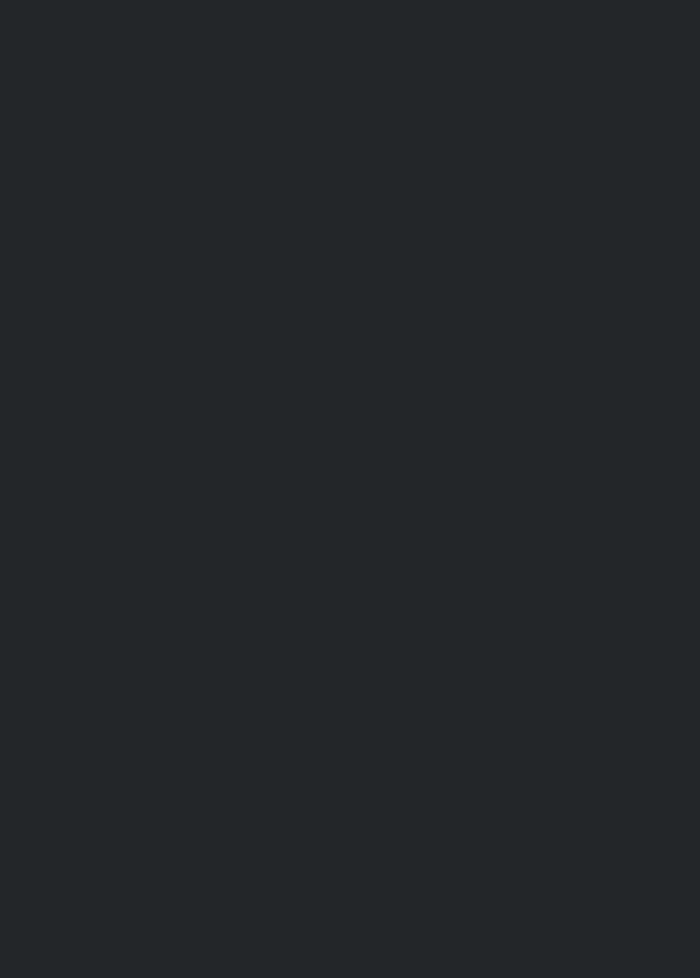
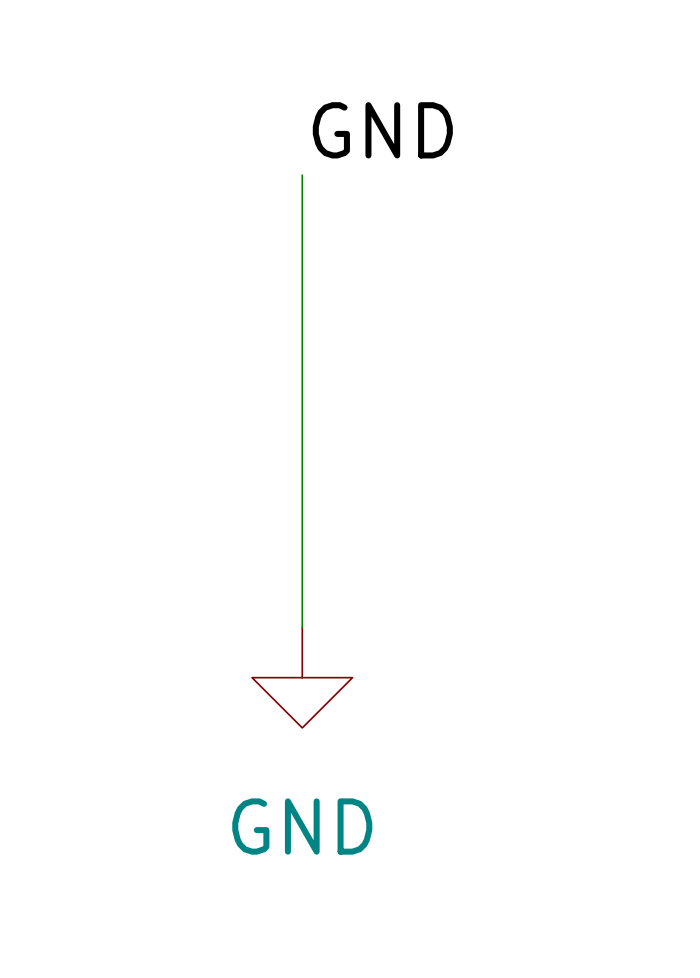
label: none -> GND (382, 130)
wire: none -> (302, 175) (302, 627)
power symbol: none -> GND (302, 677)

